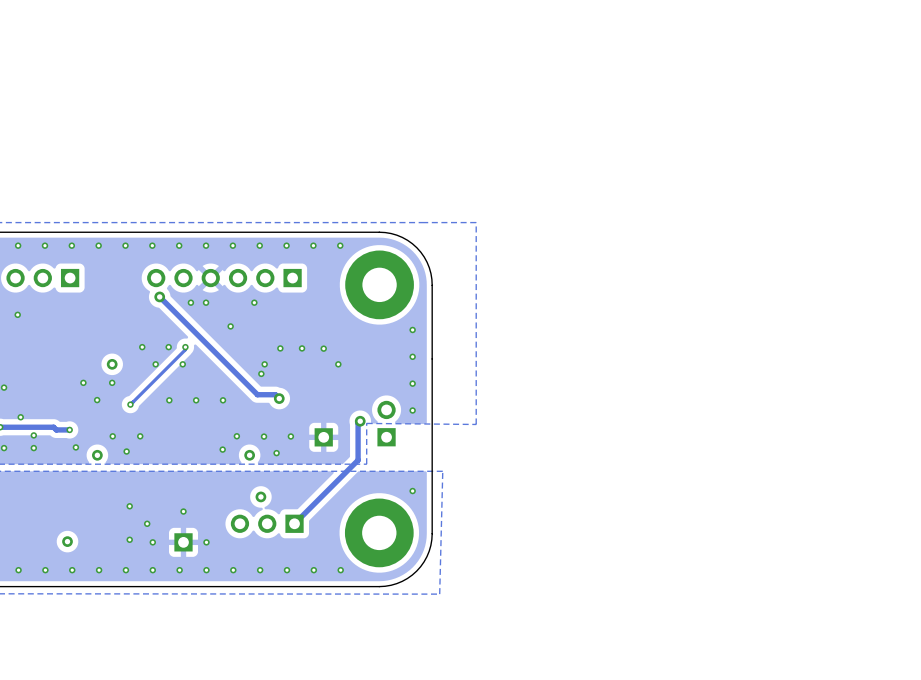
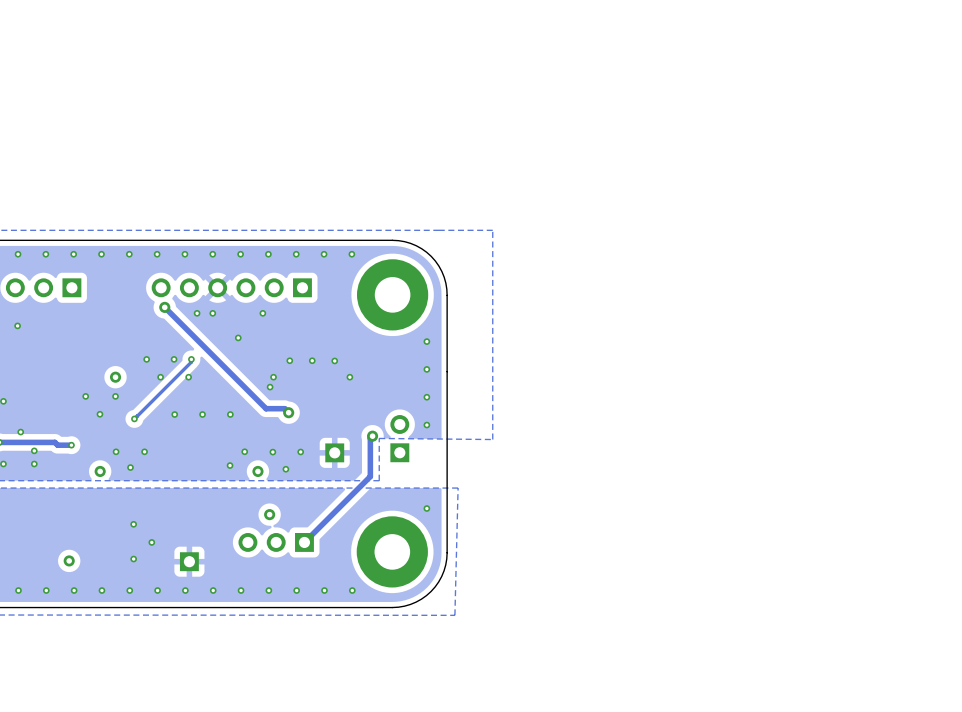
via: (75, 447) -> none
via: (183, 511) -> none
via: (152, 542) -> none
via: (206, 542) -> none

